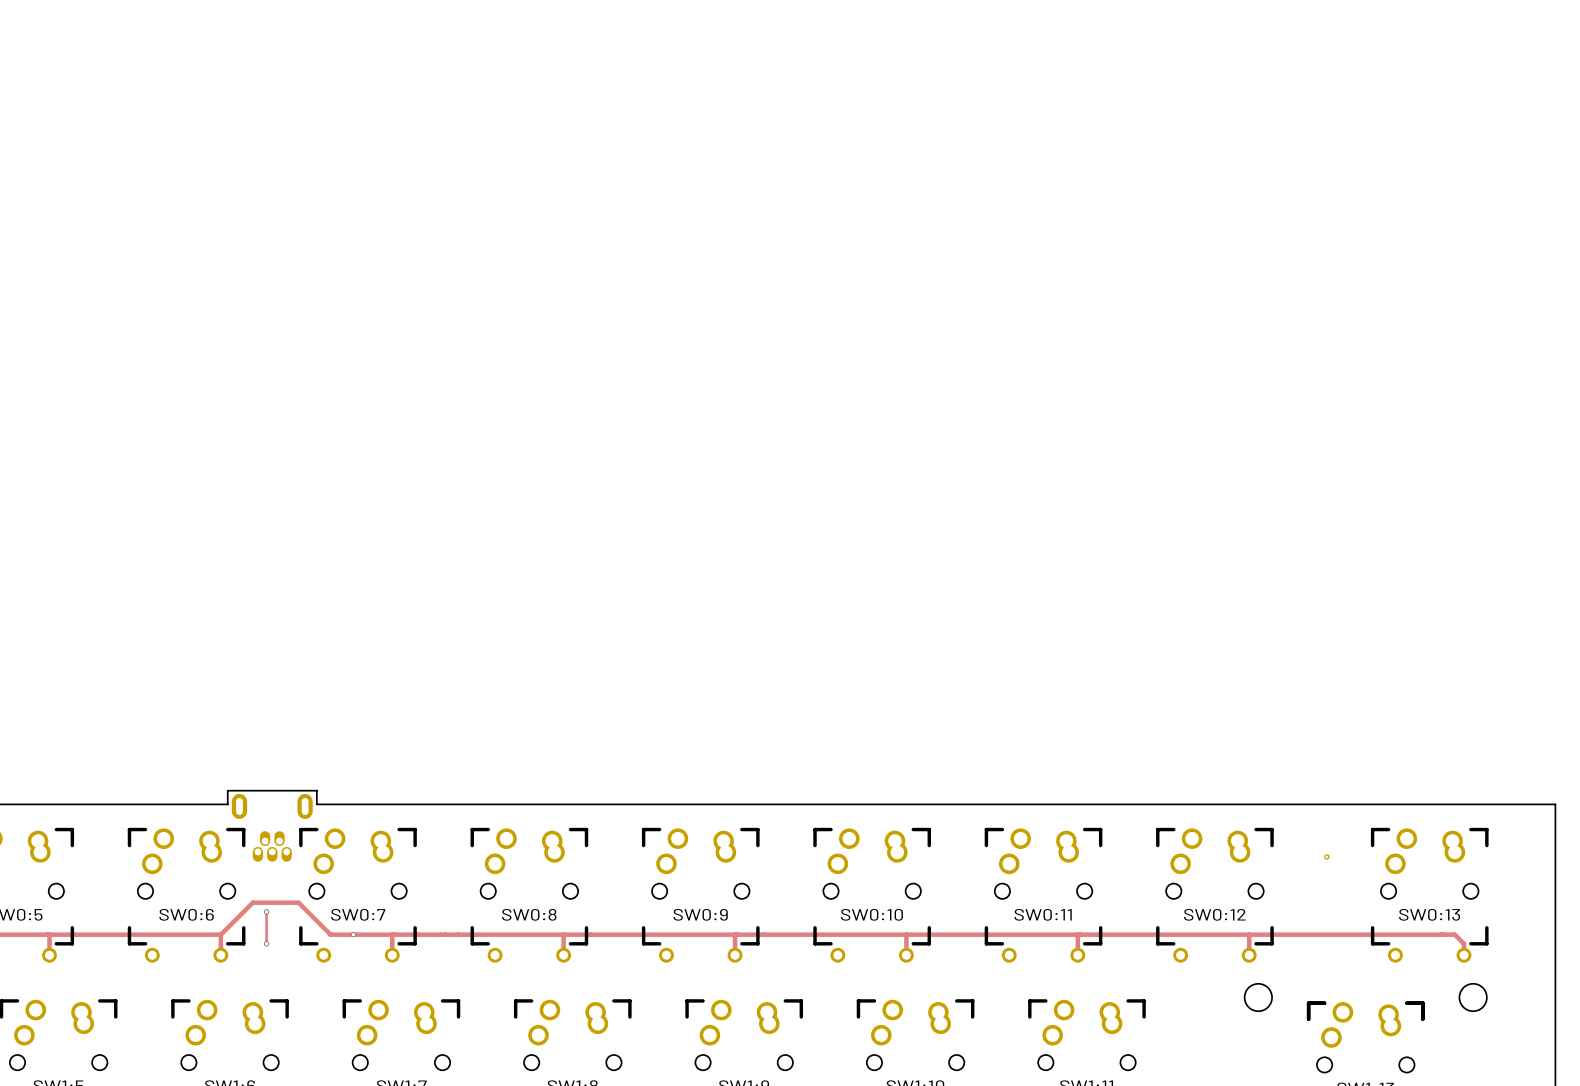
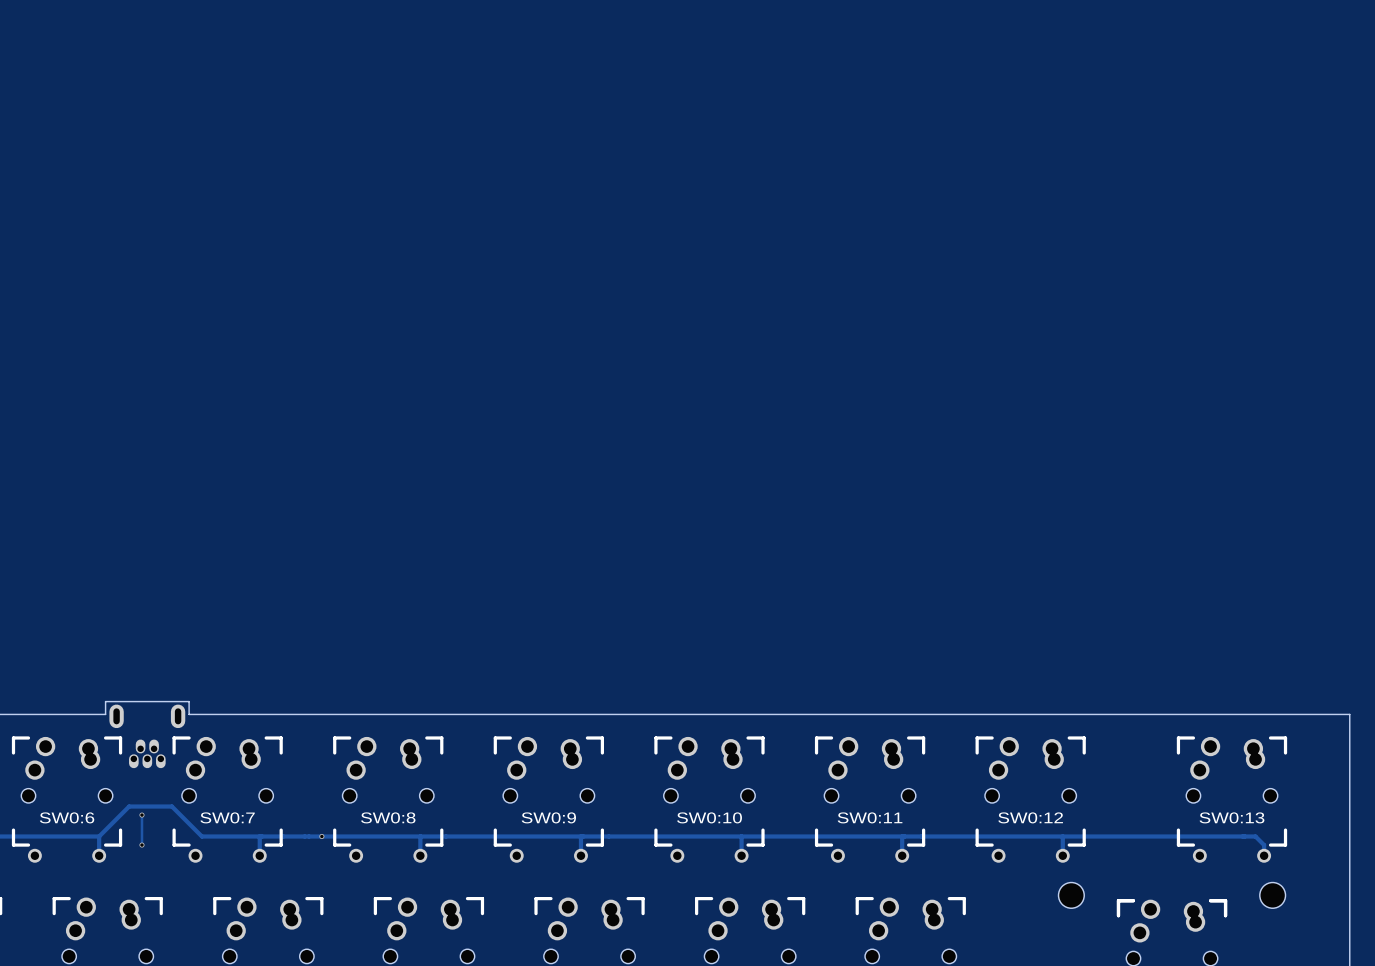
part: (1326, 856) -> none
via: (353, 934) -> none
via: none -> (321, 836)

